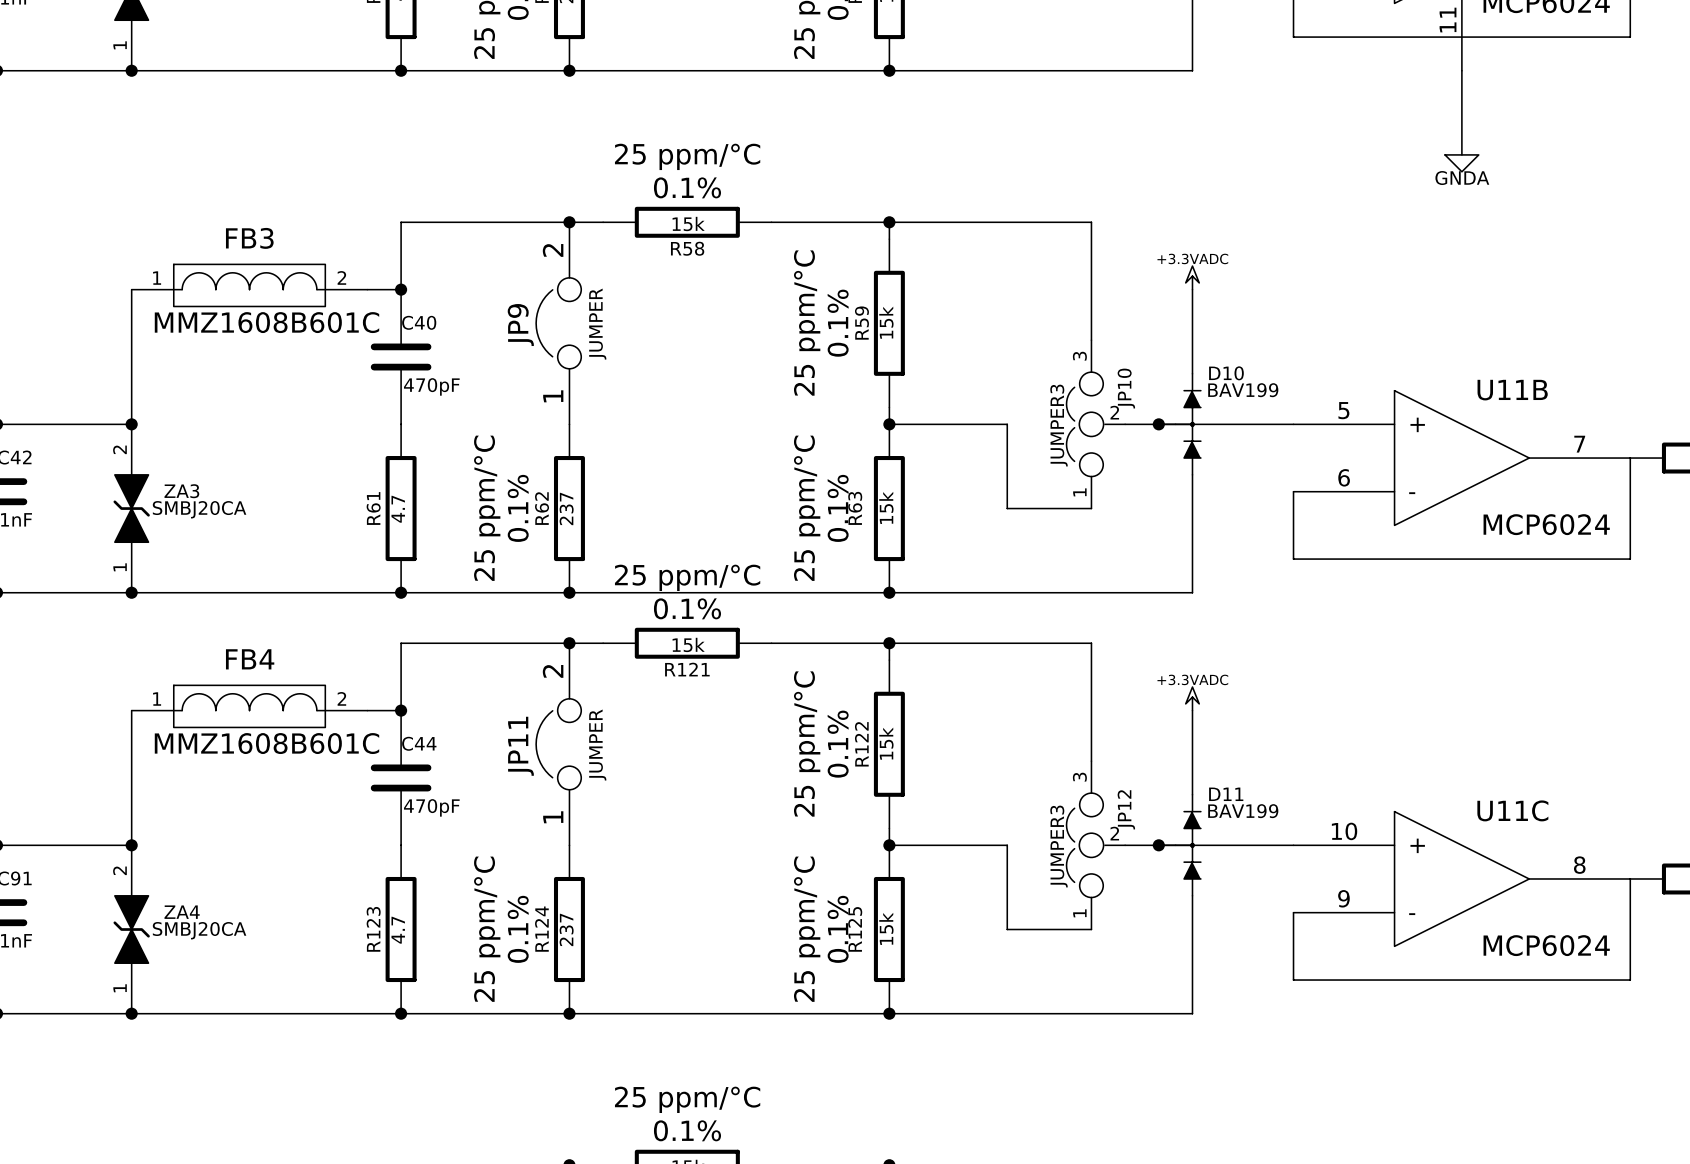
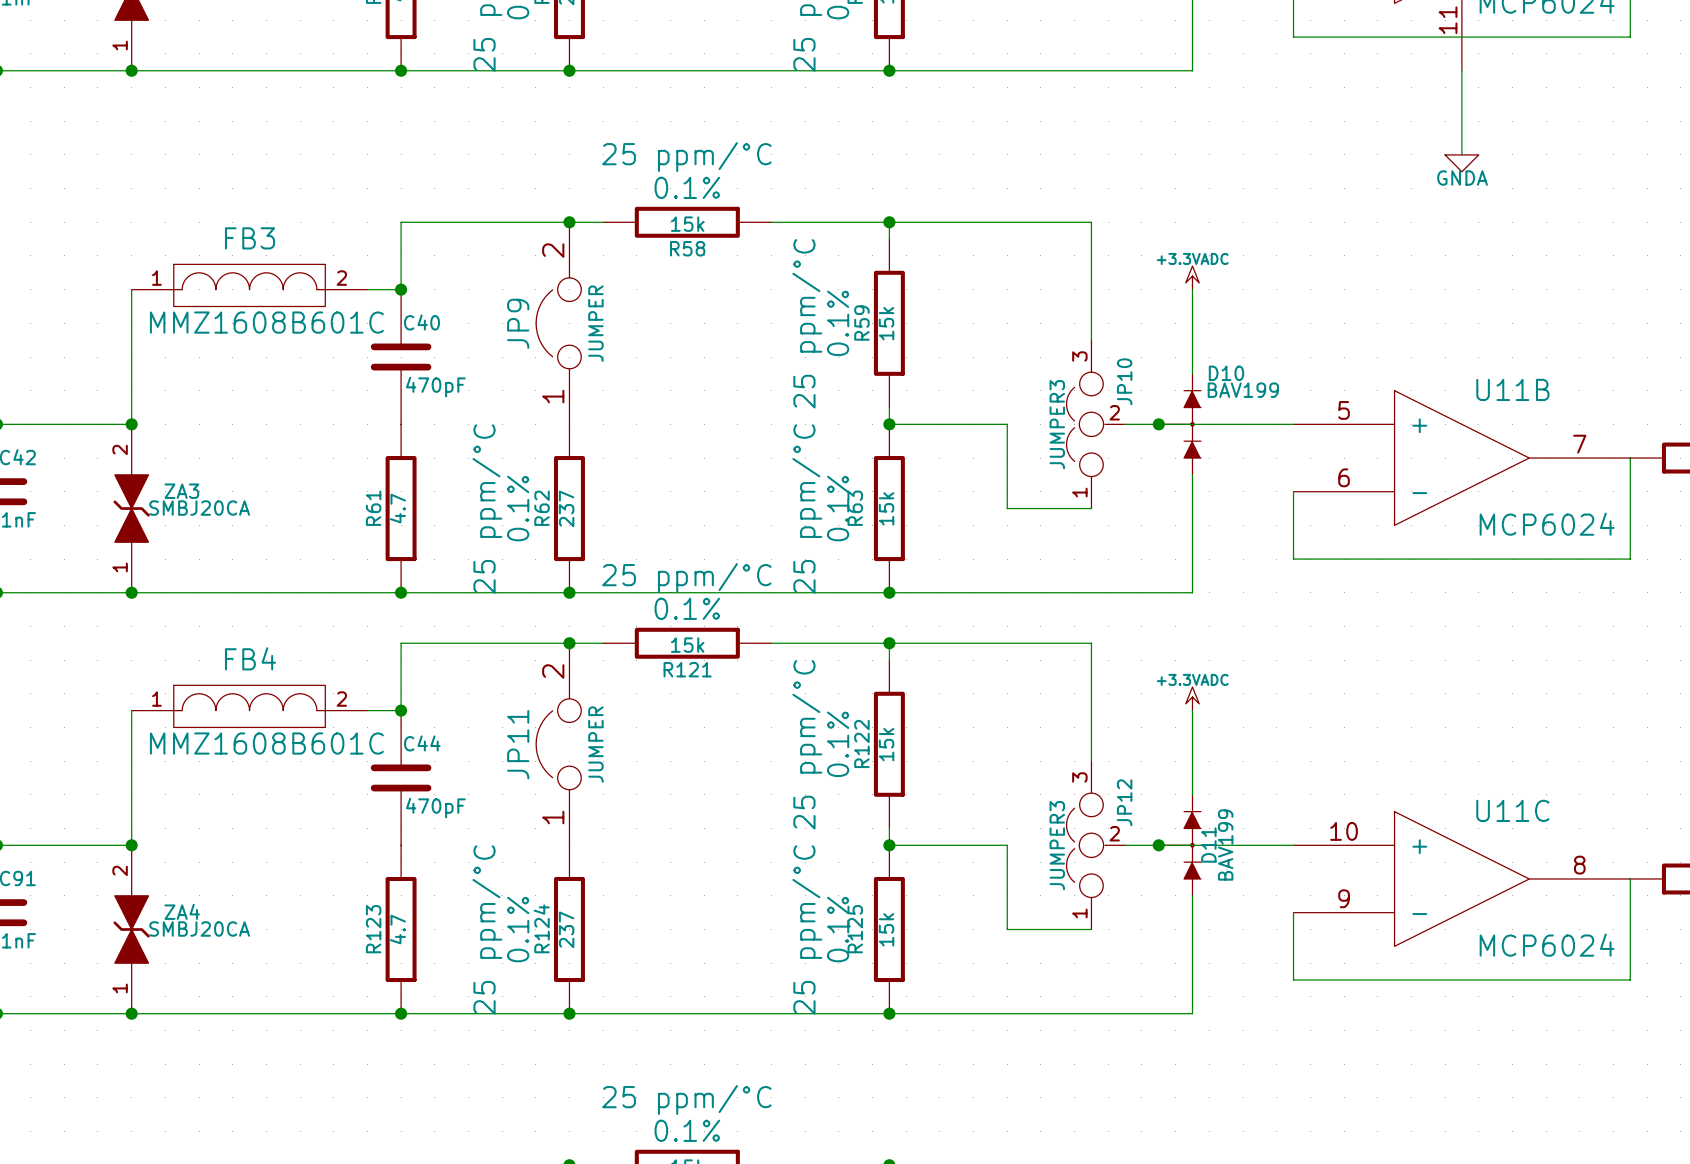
D11 name rotation: 0° (1226, 794) -> 90° counterclockwise (1208, 844)
D11 name position: D11 (1226, 794) -> D11 (1208, 844)
D11 value rotation: 0° (1243, 811) -> 90° counterclockwise (1225, 844)

